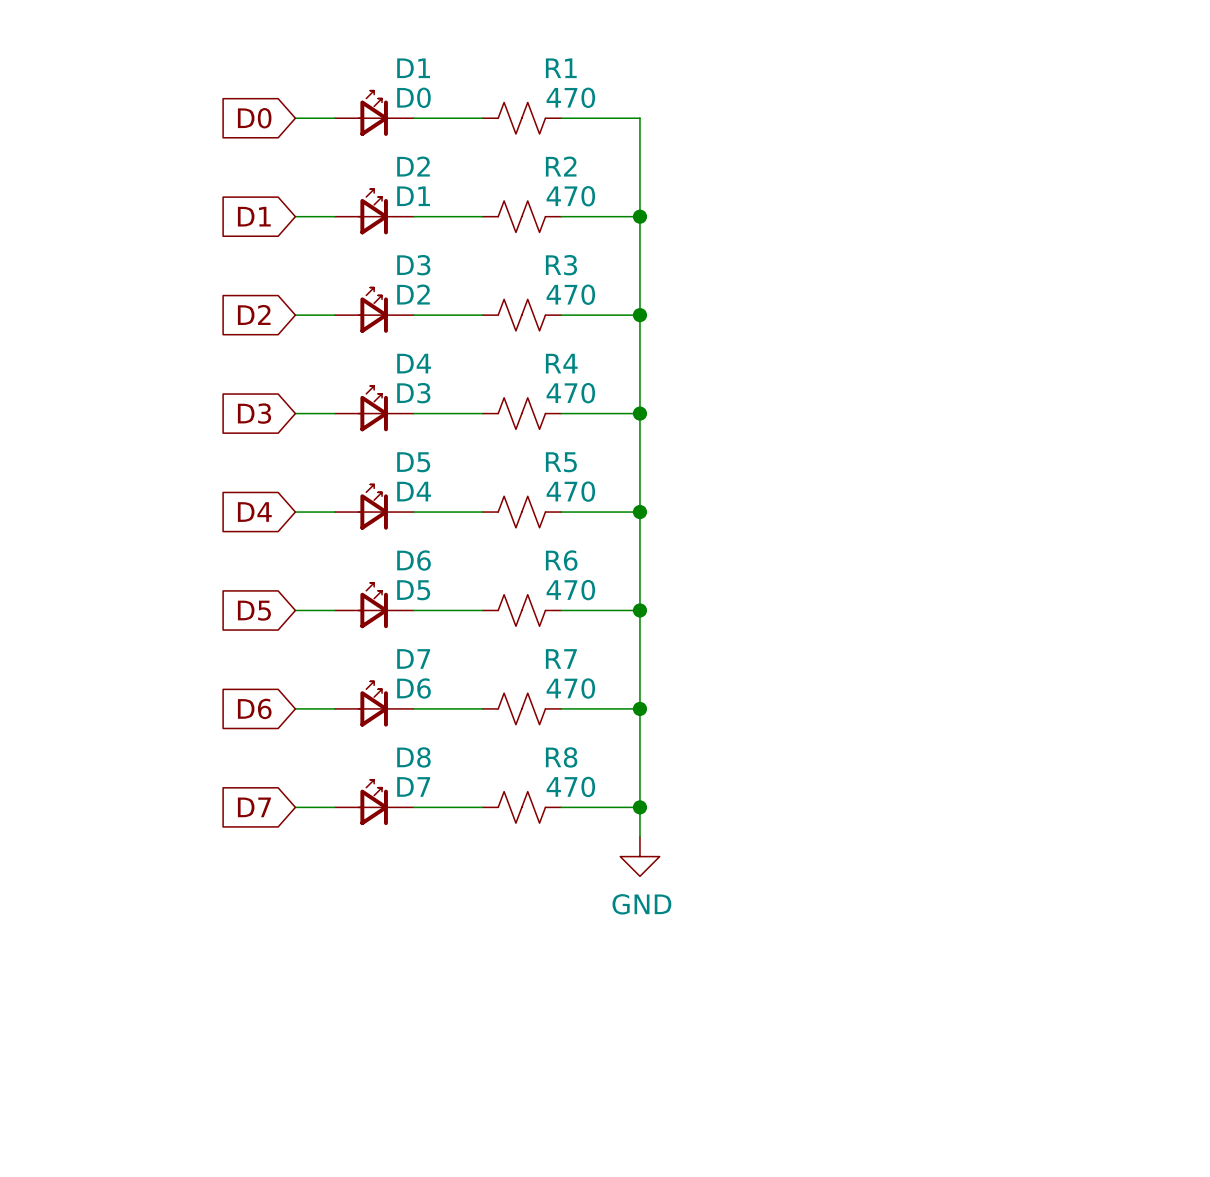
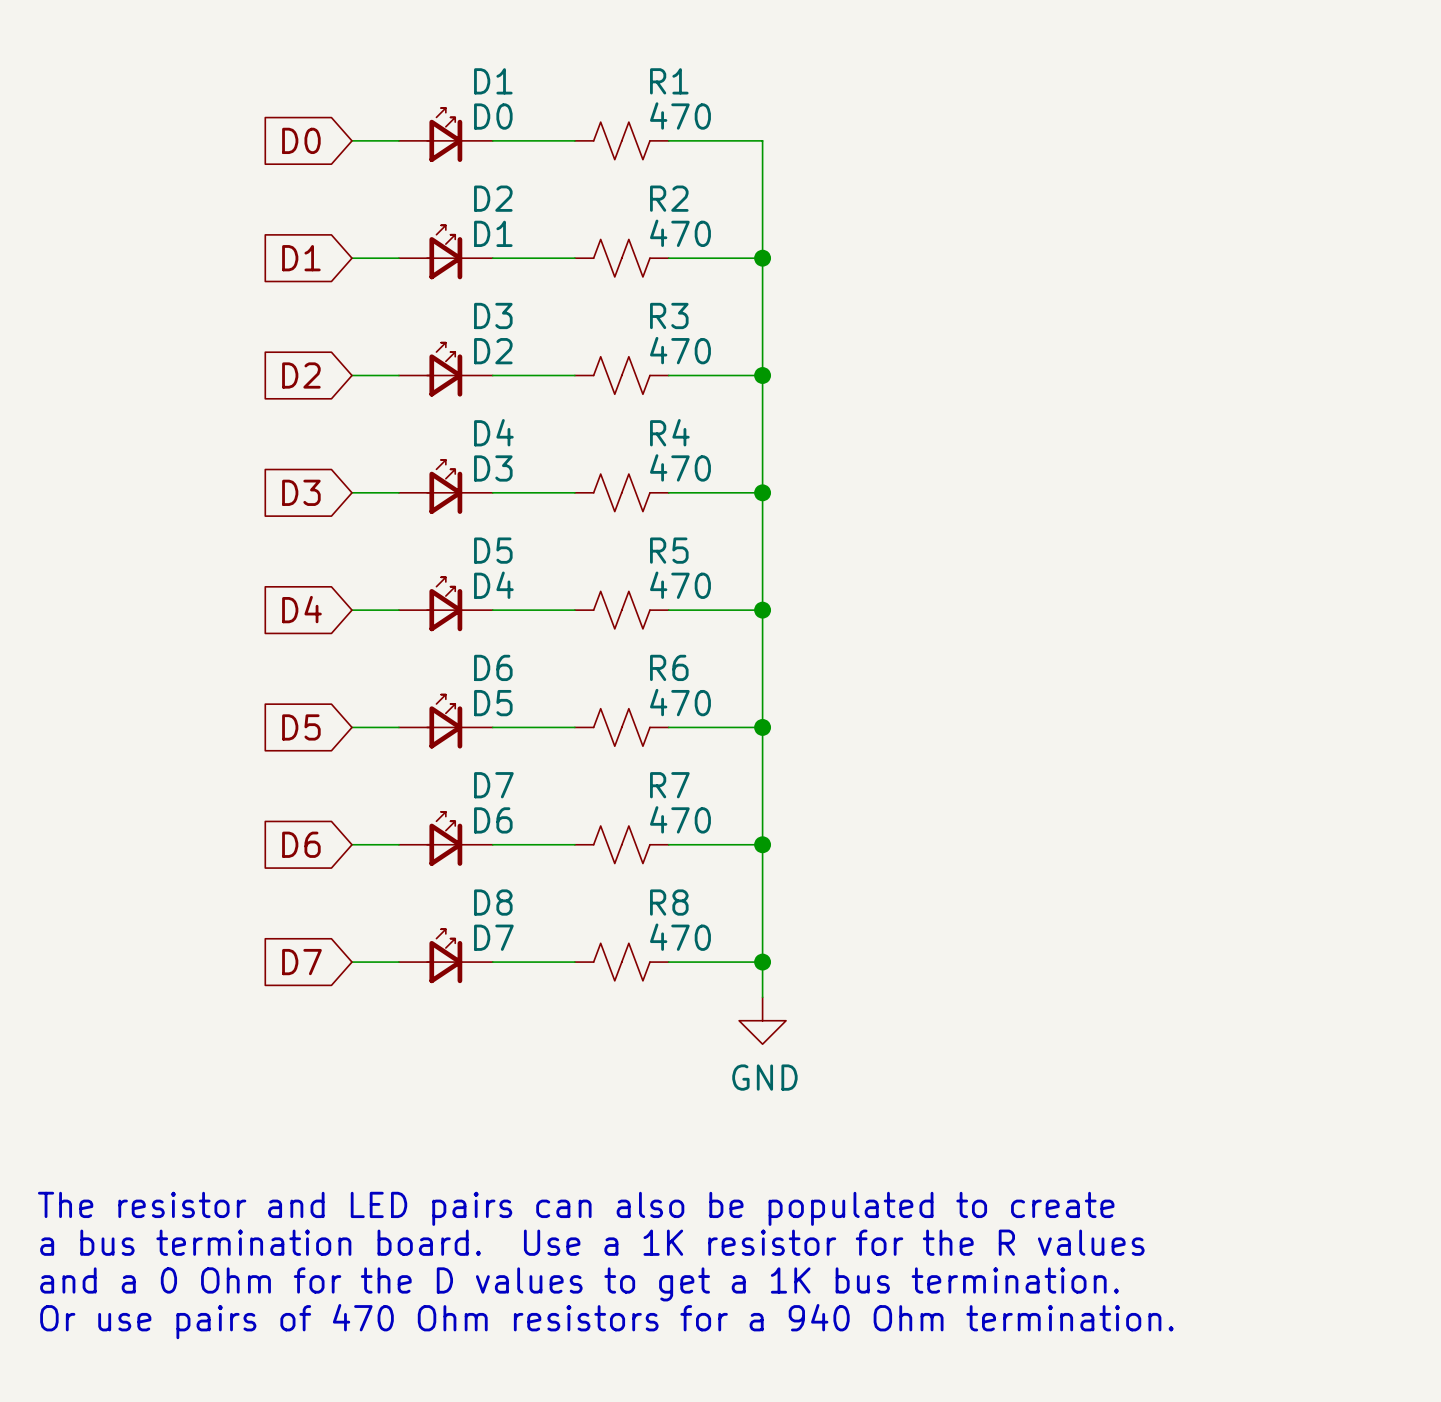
text: none -> The resistor and LED pairs can also be populated to create (576, 1208)
text: none -> a bus termination board. Use a 1K resistor for the R values (592, 1242)
text: none -> and a 0 Ohm for the D values to get a 1K bus termination. (579, 1284)
text: none -> Or use pairs of 470 Ohm resistors for a 940 Ohm termination. (606, 1321)

